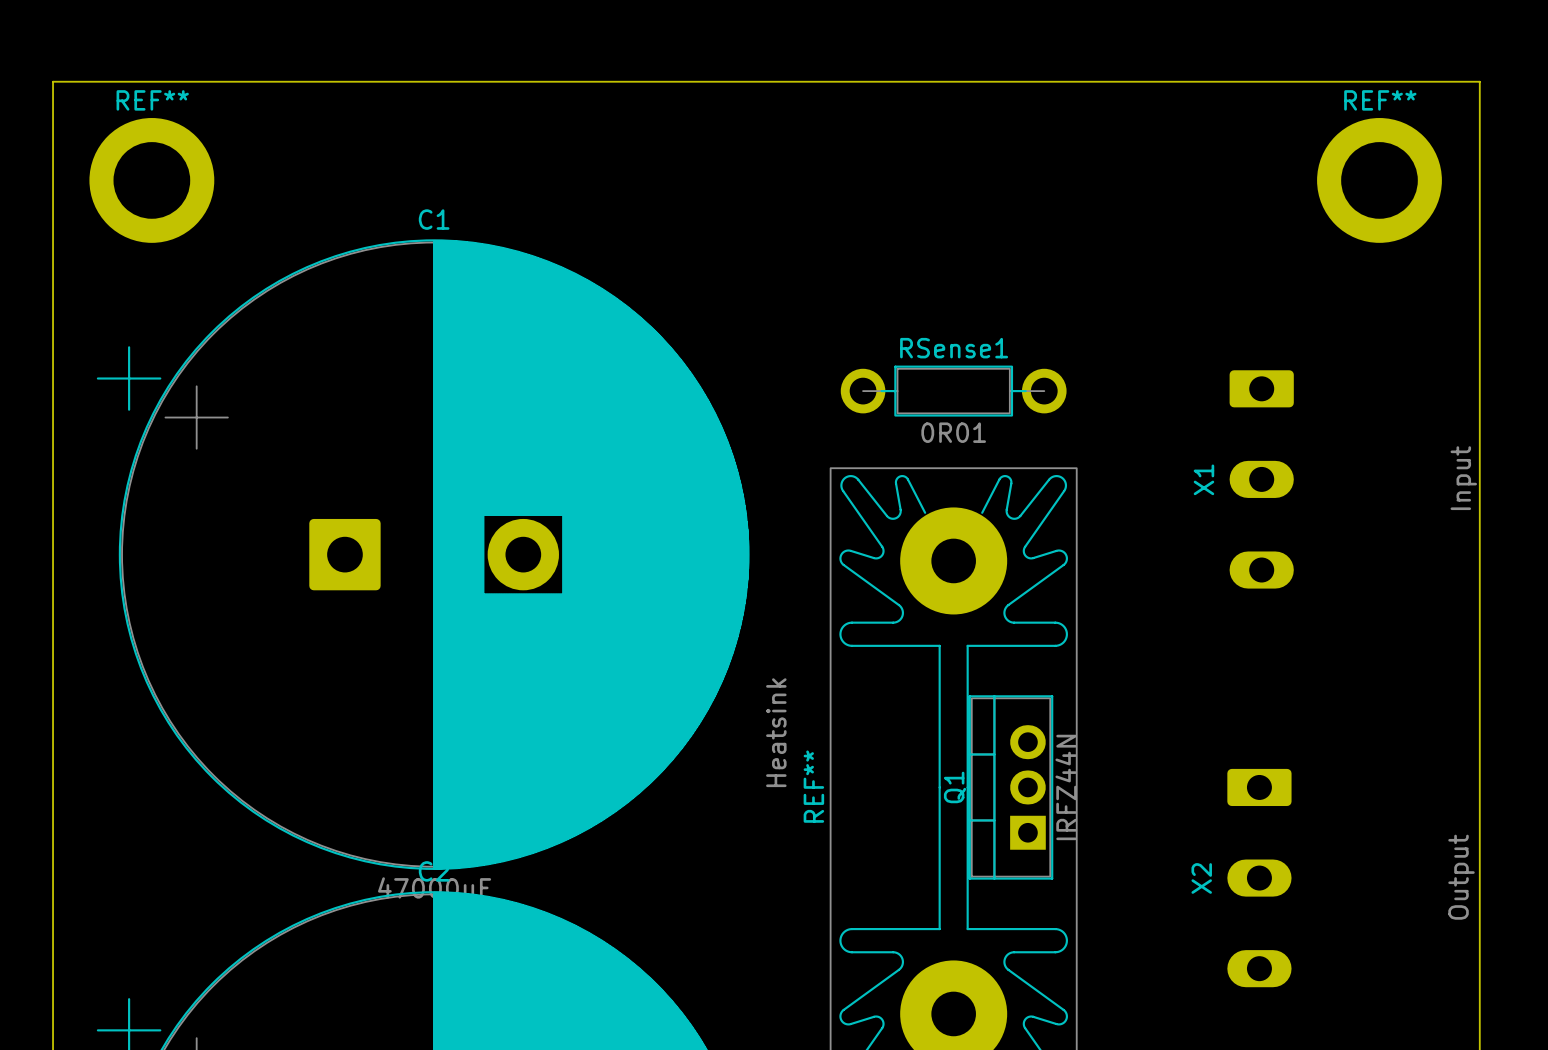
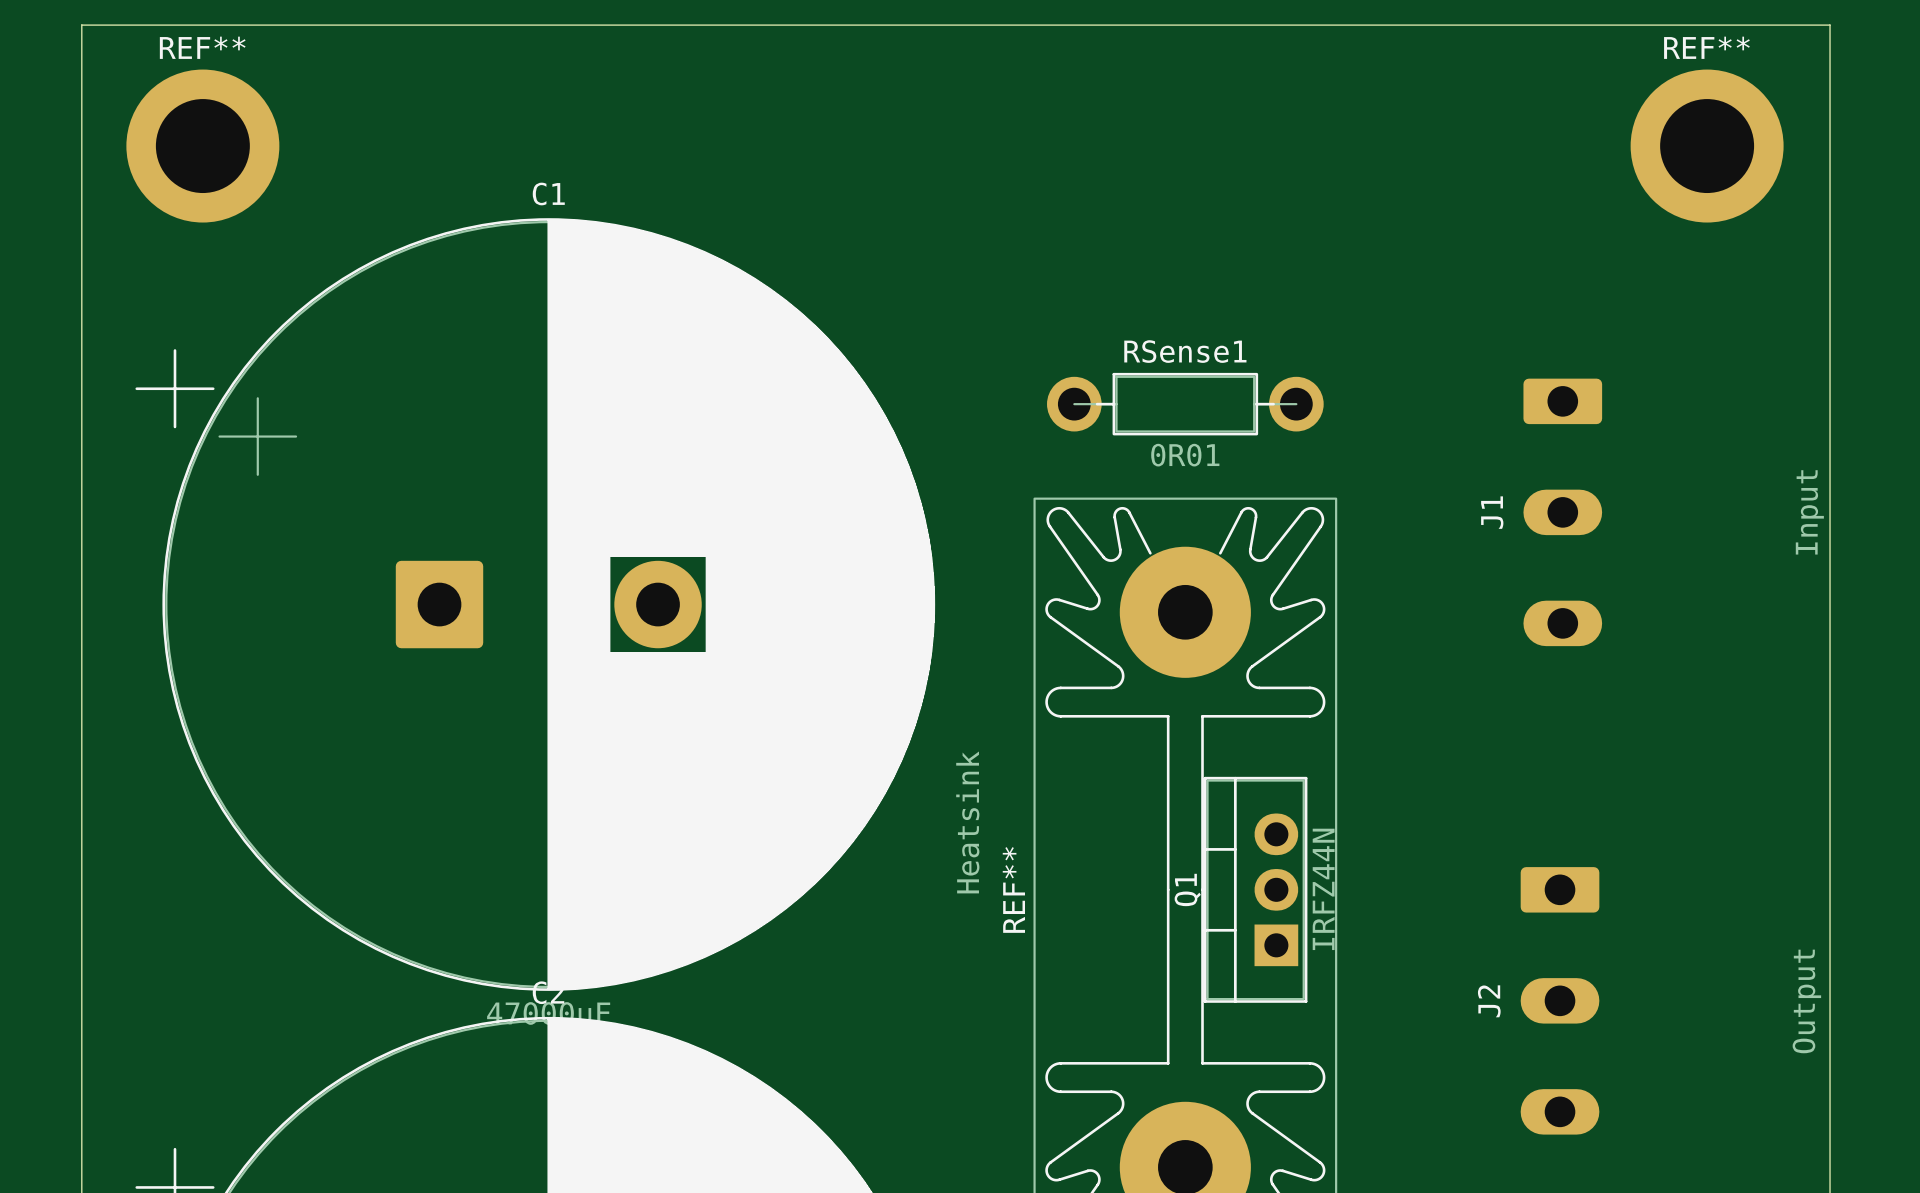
X1 name: X1 (1203, 479) -> J1 (1492, 512)
X2 name: X2 (1201, 878) -> J2 (1489, 1001)

